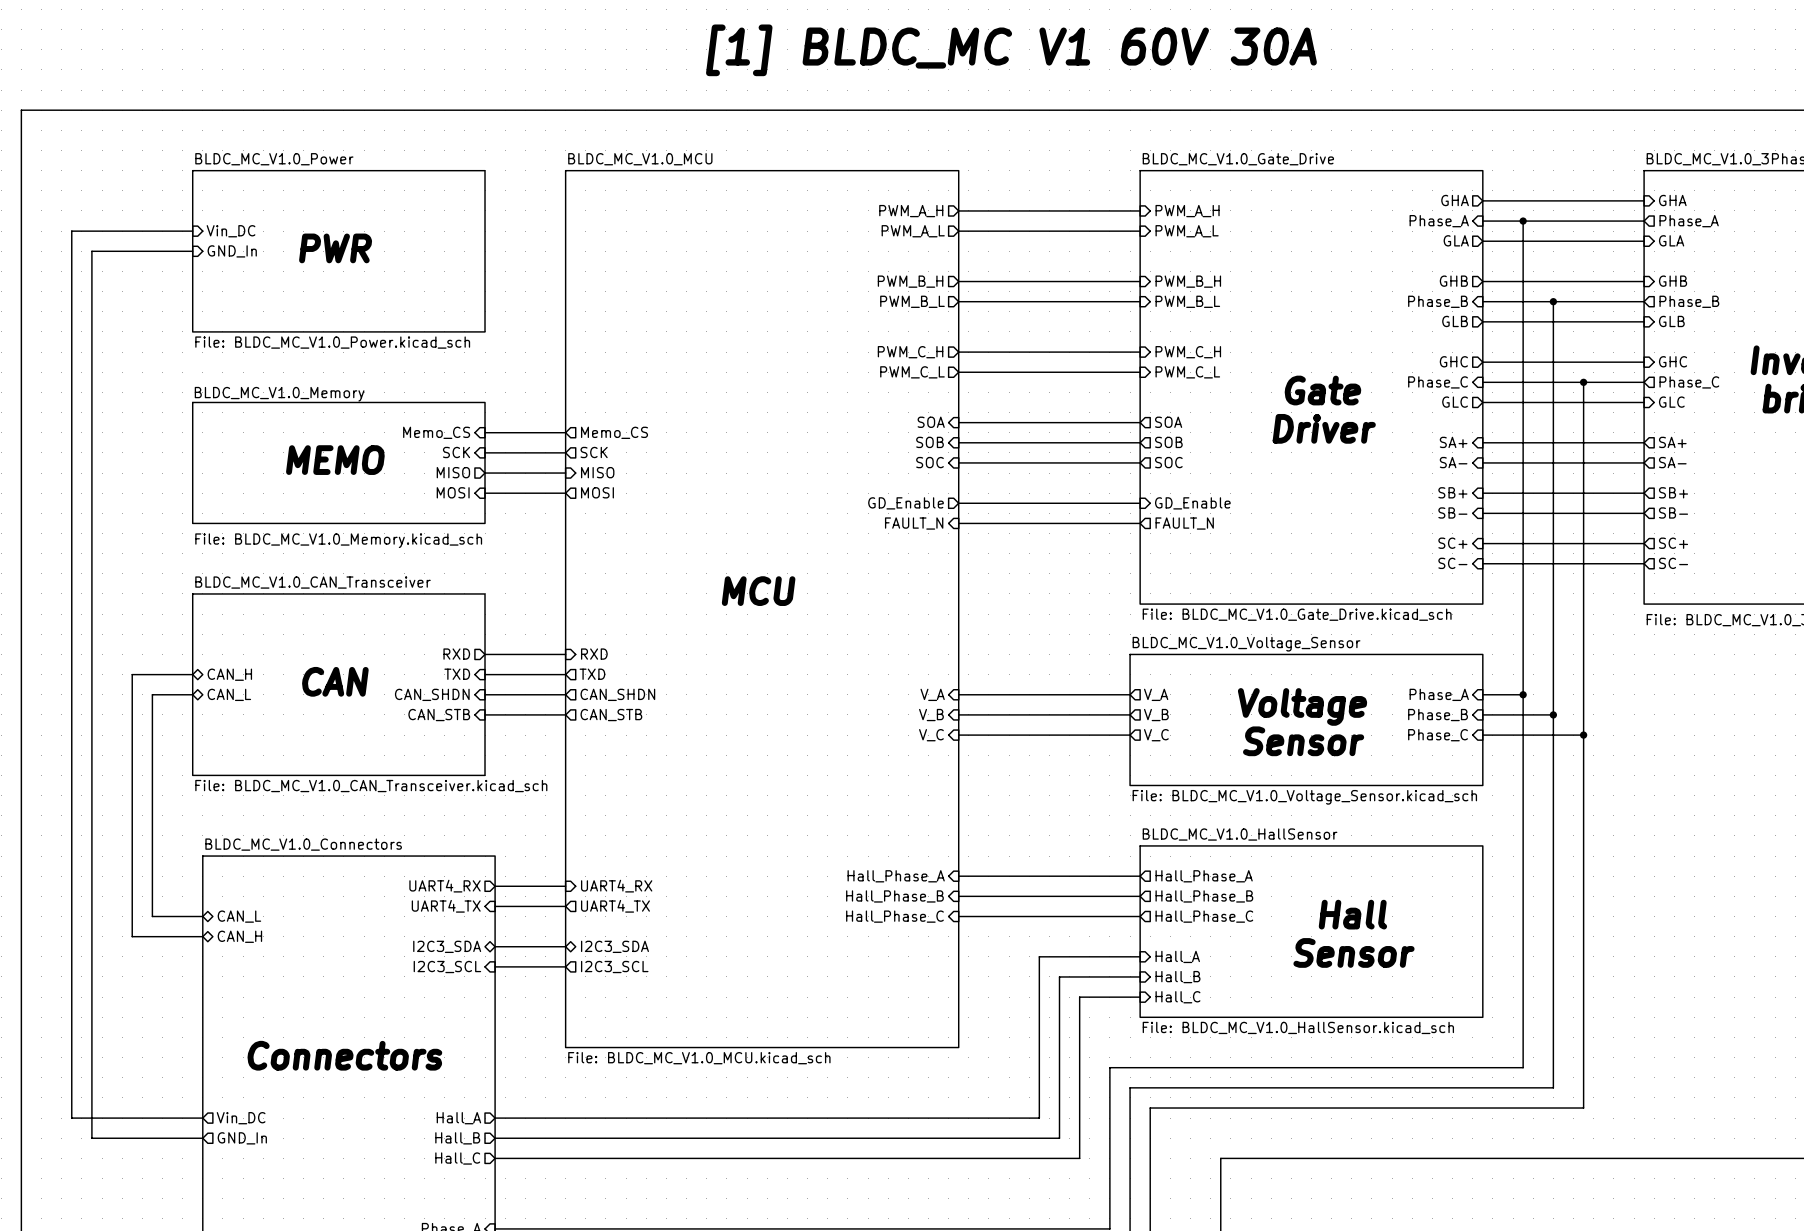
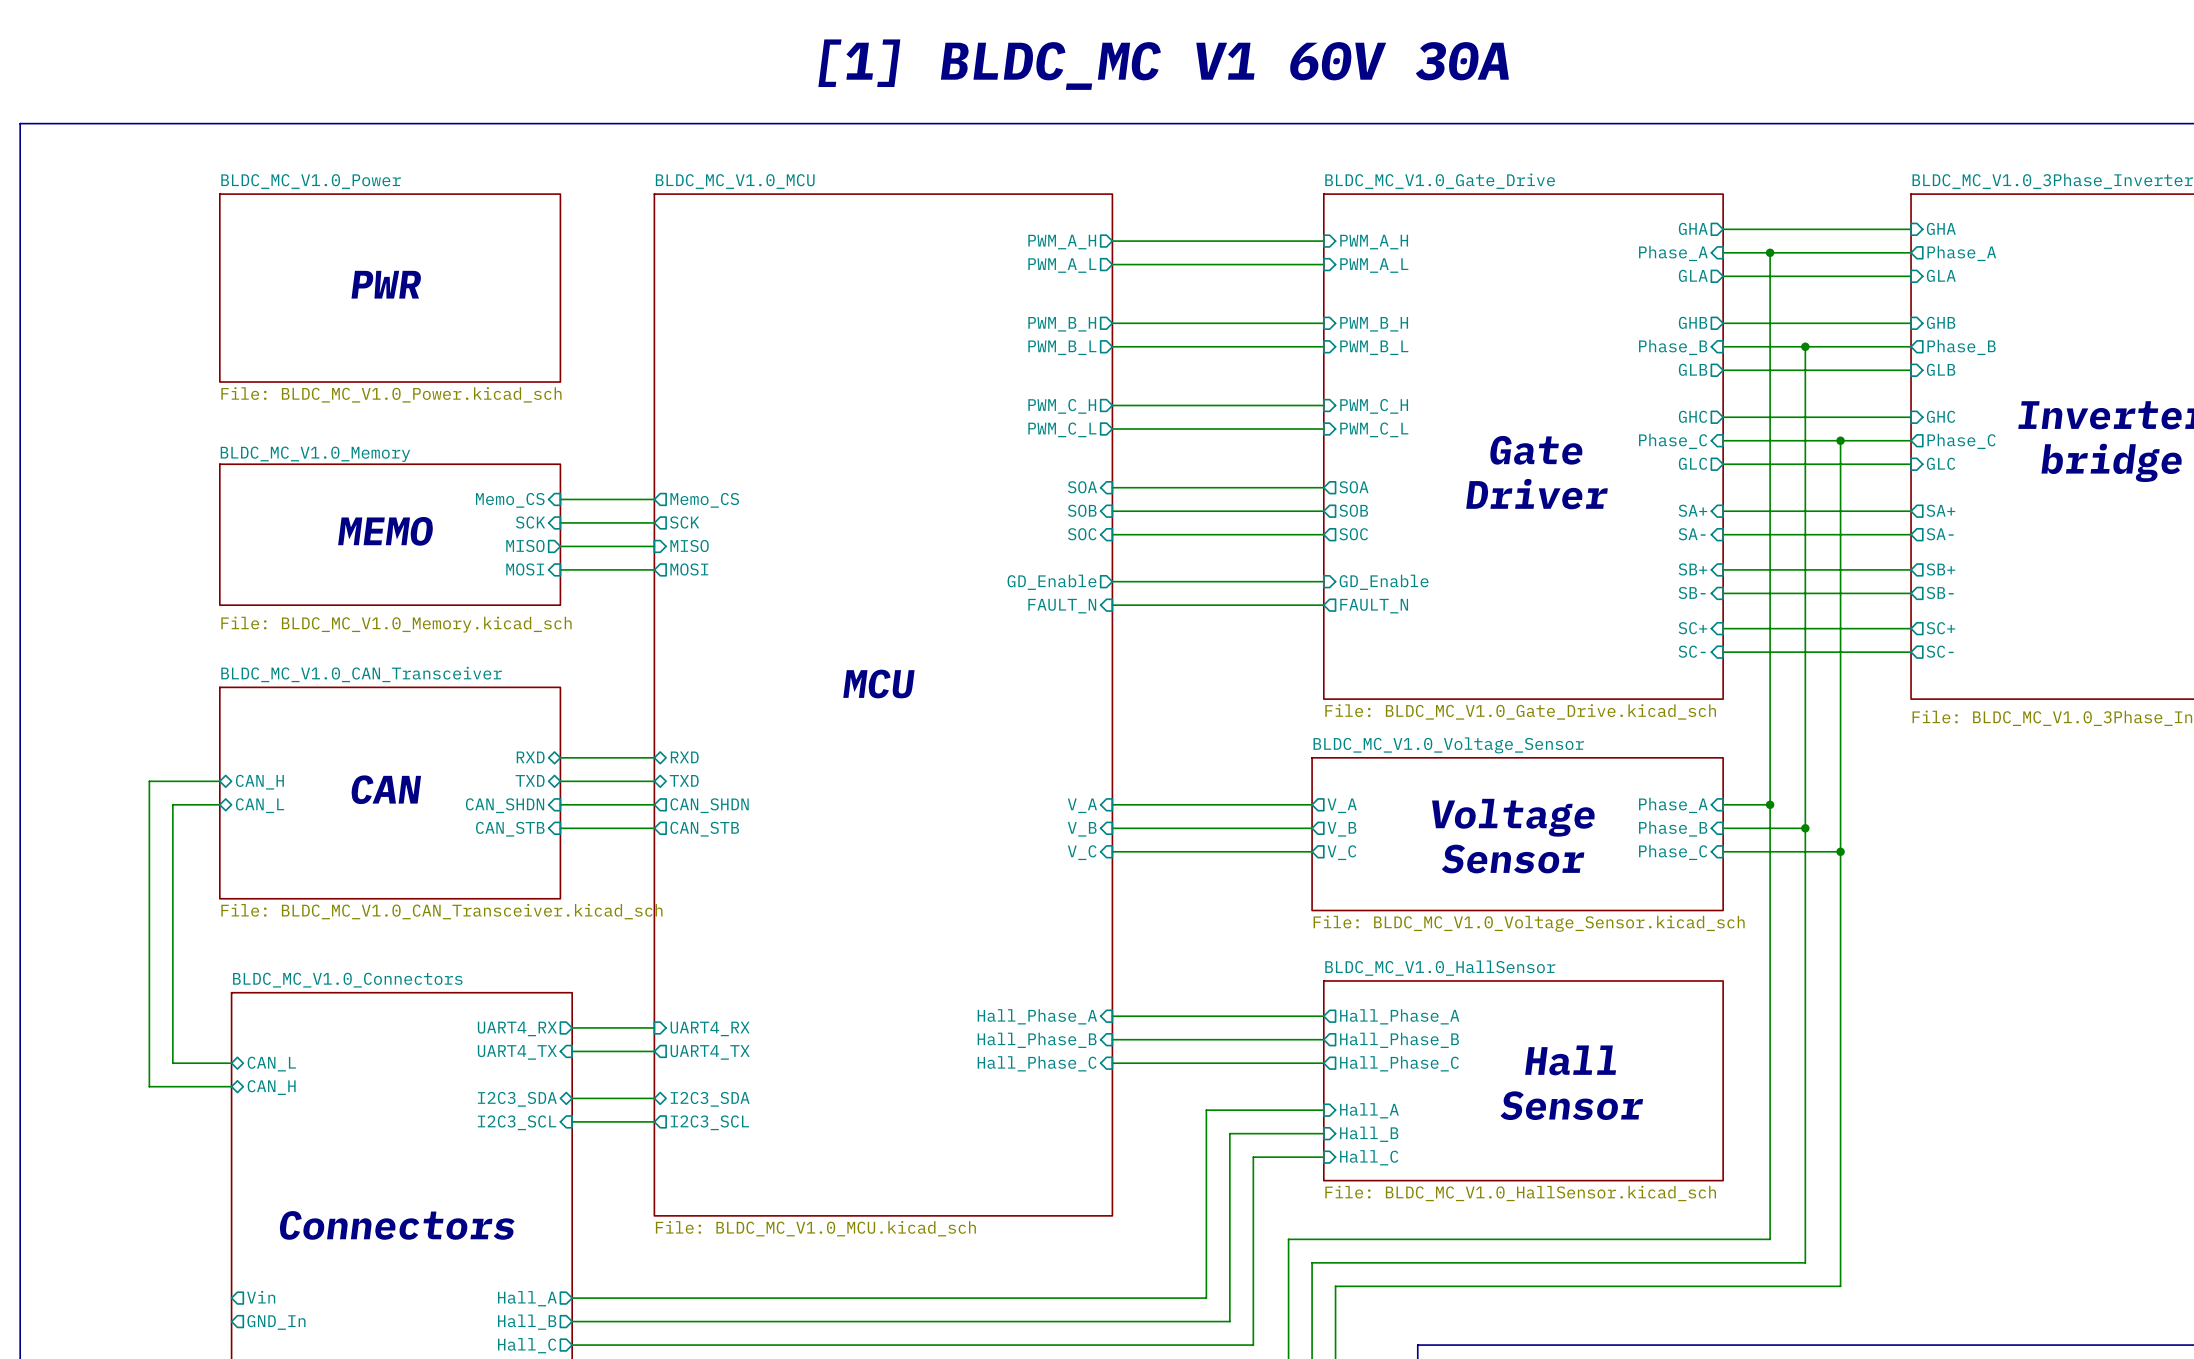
text position: [1] BLDC_MC V1 60V 30A (1011, 50) -> [1] BLDC_MC V1 60V 30A (1163, 64)
wire: (192, 231) (71, 231) (71, 1118) (202, 1118) -> none
sheet pin: Vin_DC (231, 231) -> none
wire: (192, 251) (91, 251) (91, 1138) (202, 1138) -> none
sheet pin: GND_In (232, 251) -> none
sheet pin shape: output (456, 654) -> bidirectional (530, 757)
sheet pin shape: input (594, 654) -> bidirectional (684, 757)
sheet pin shape: input (457, 674) -> bidirectional (530, 780)
sheet pin shape: output (592, 674) -> bidirectional (684, 780)
sheet pin: Vin_DC (241, 1118) -> Vin (261, 1297)

